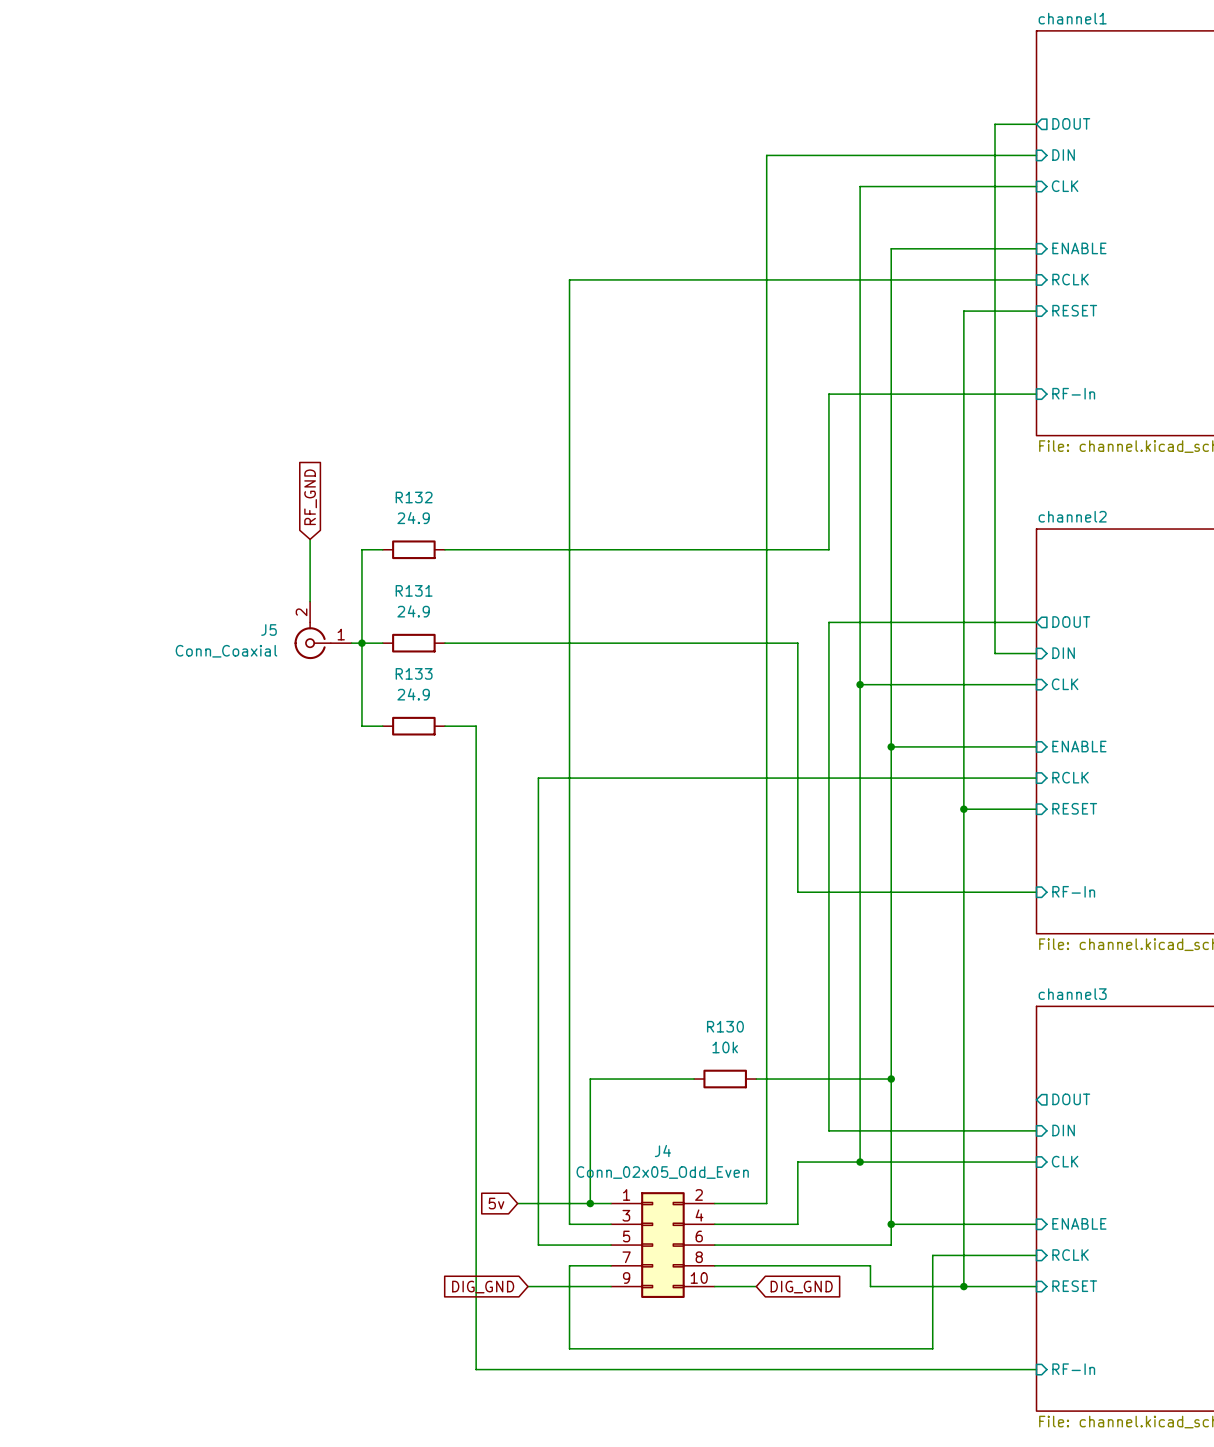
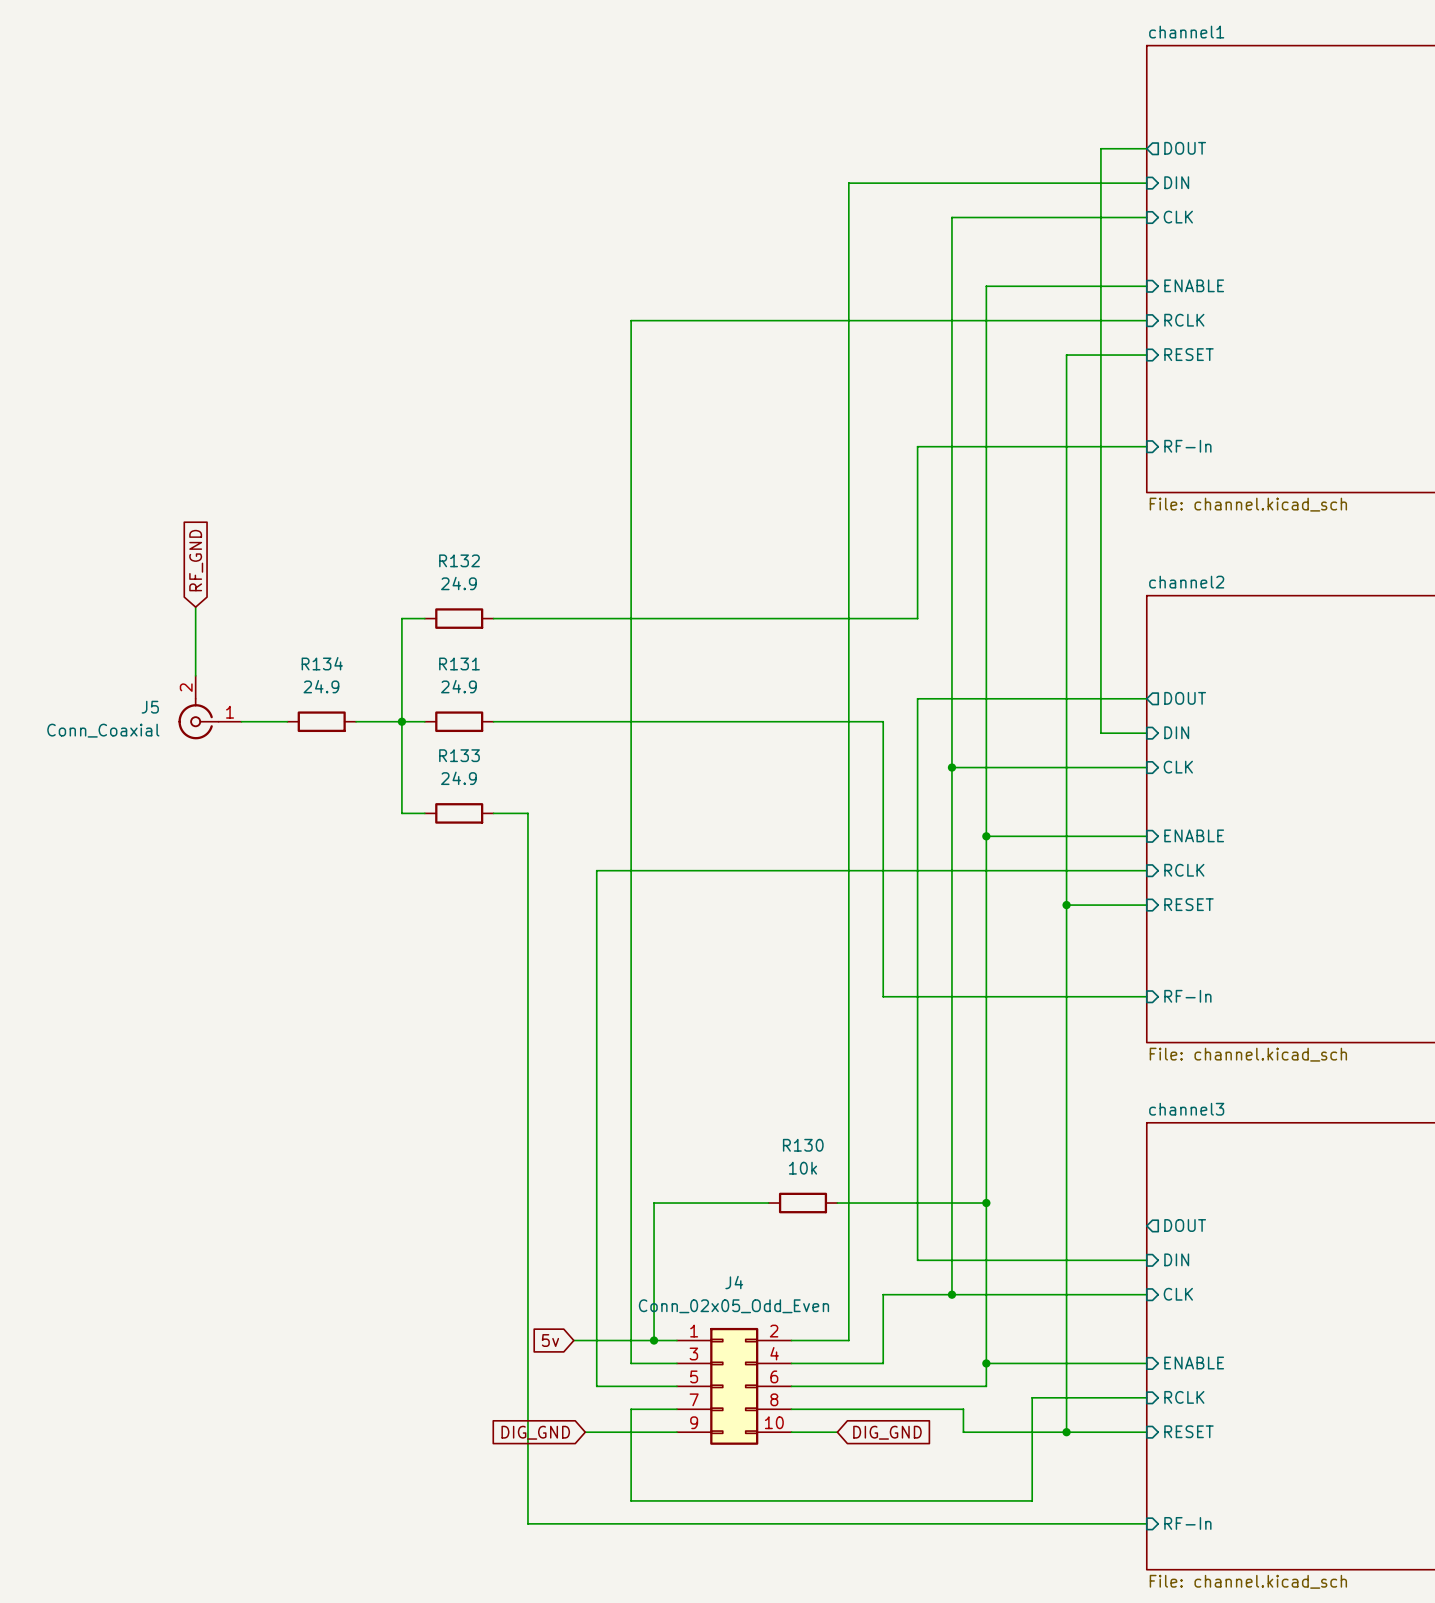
global label position: RF_GND (310, 497) -> RF_GND (196, 560)
wire: (310, 539) (310, 601) -> (195, 607) (195, 675)
J5 position: (323, 630) -> (209, 707)
wire: none -> (241, 721) (287, 721)
R134: none -> 24.9 (321, 721)

